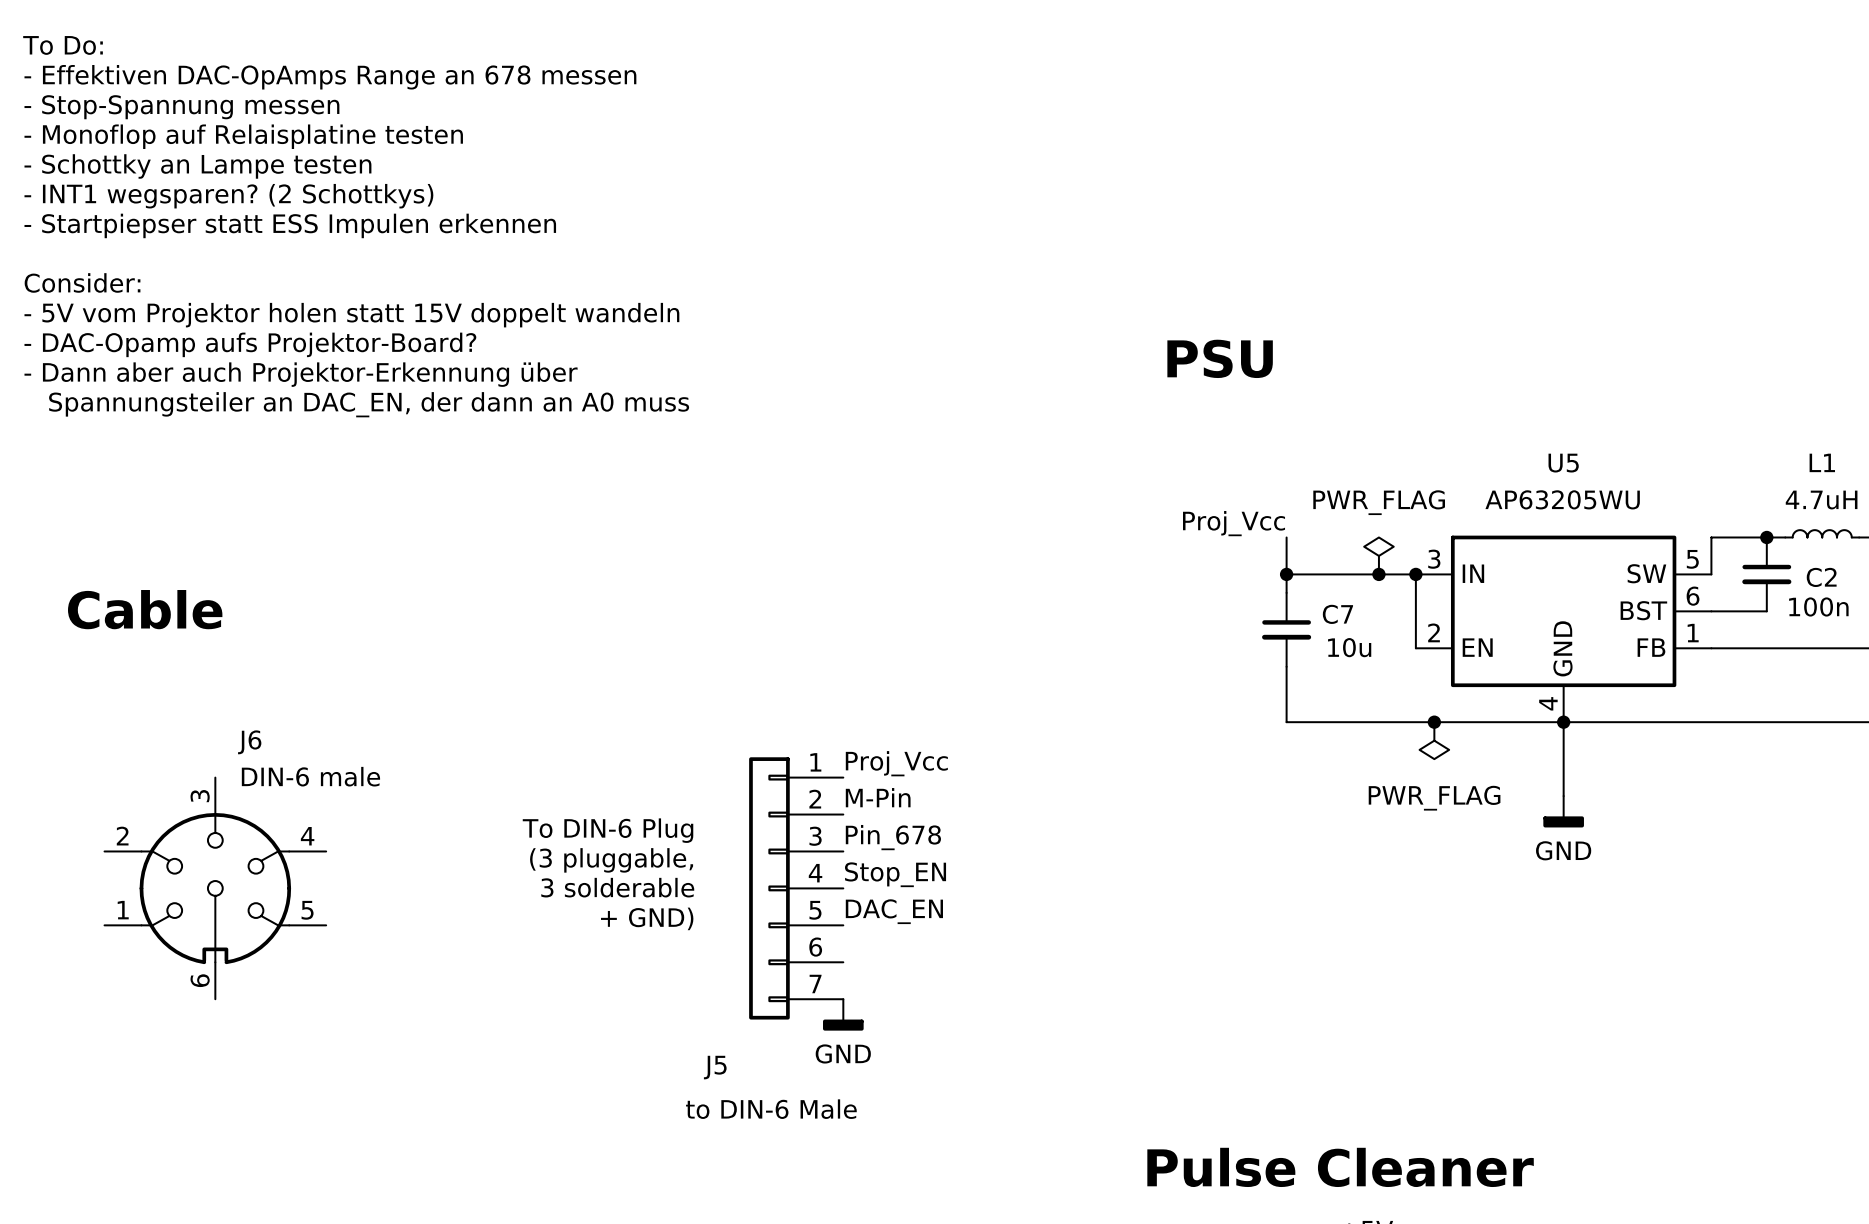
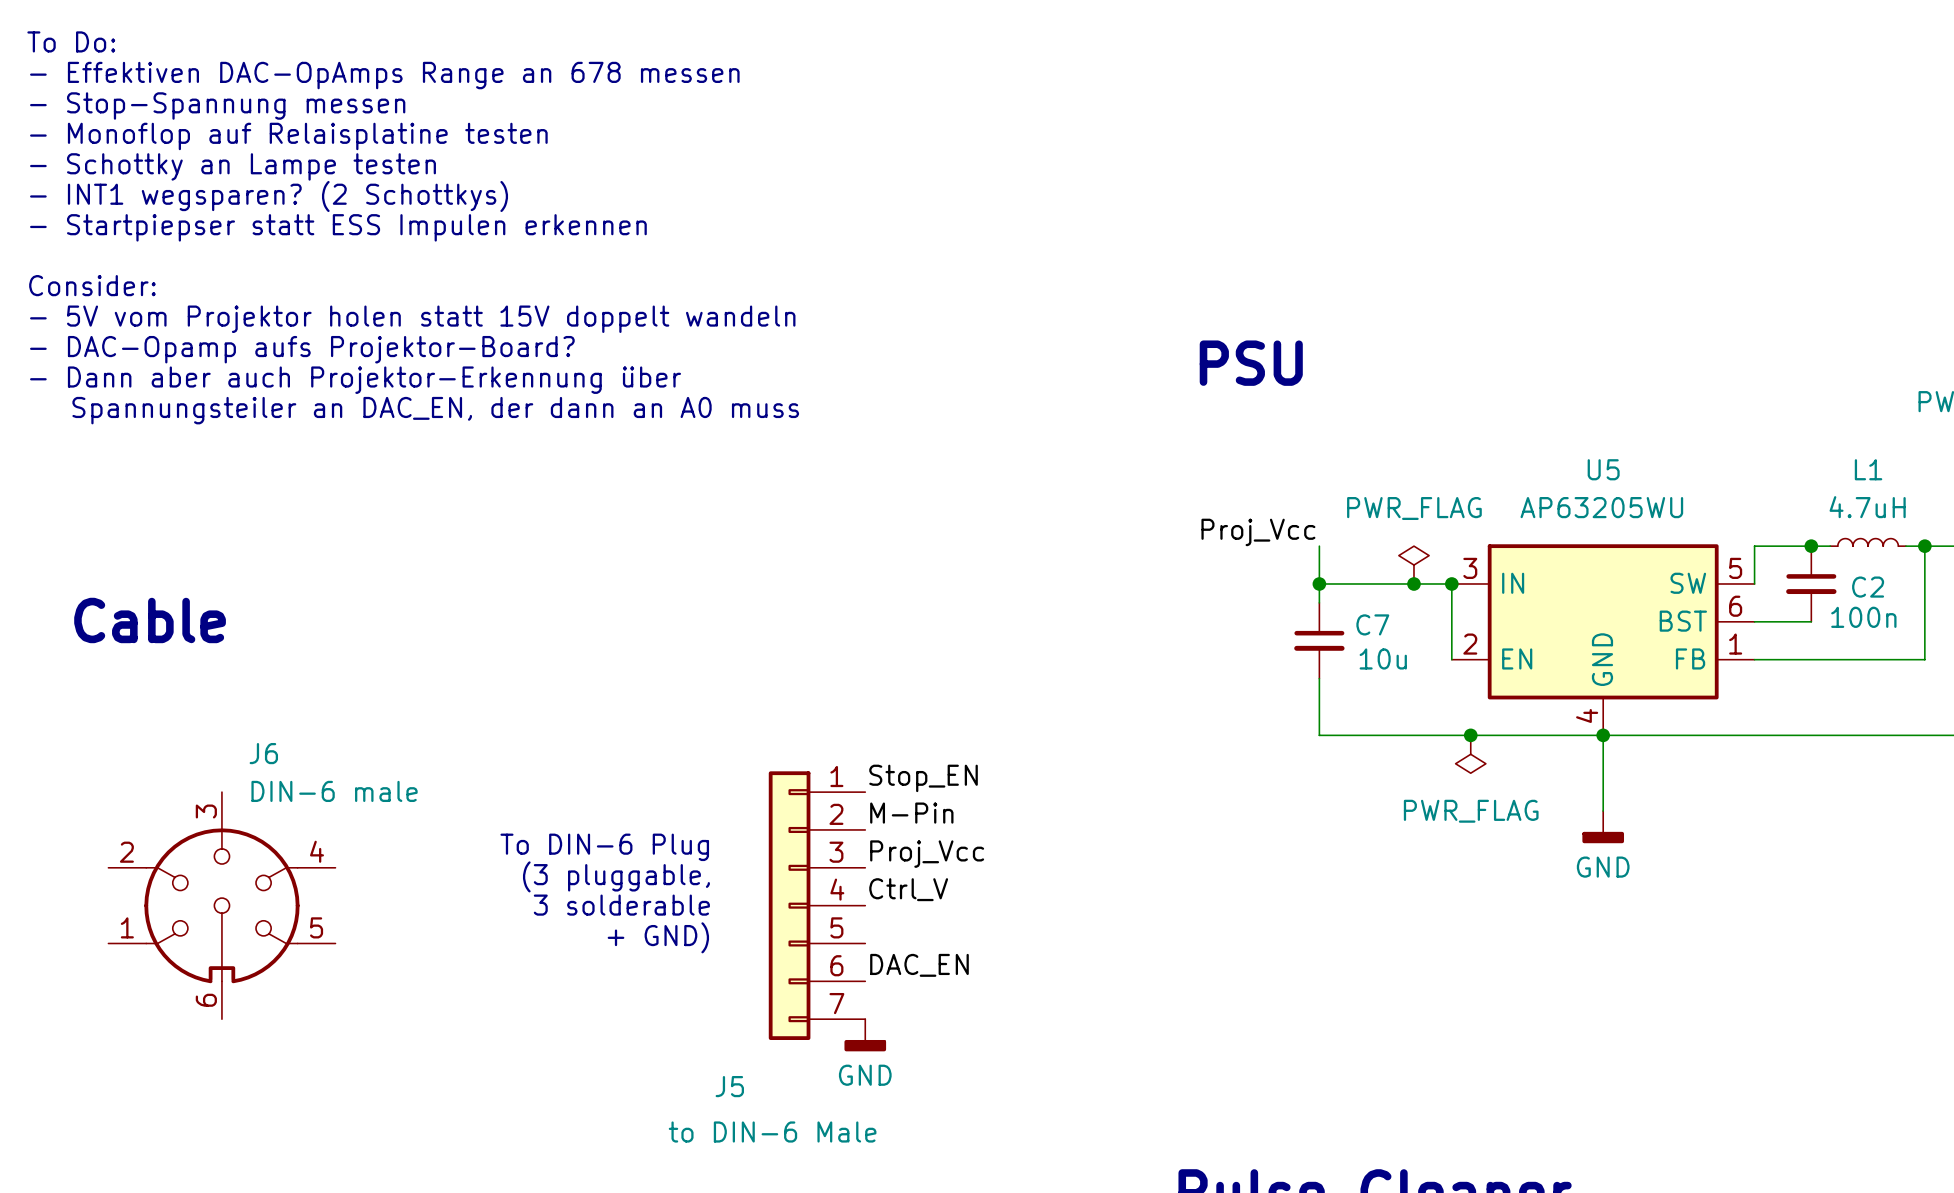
label: Proj_Vcc (896, 763) -> Stop_EN (923, 778)
label: Pin_678 (893, 837) -> Proj_Vcc (927, 854)
label: Stop_EN (895, 874) -> Ctrl_V (908, 889)
label position: DAC_EN (894, 911) -> DAC_EN (919, 965)

